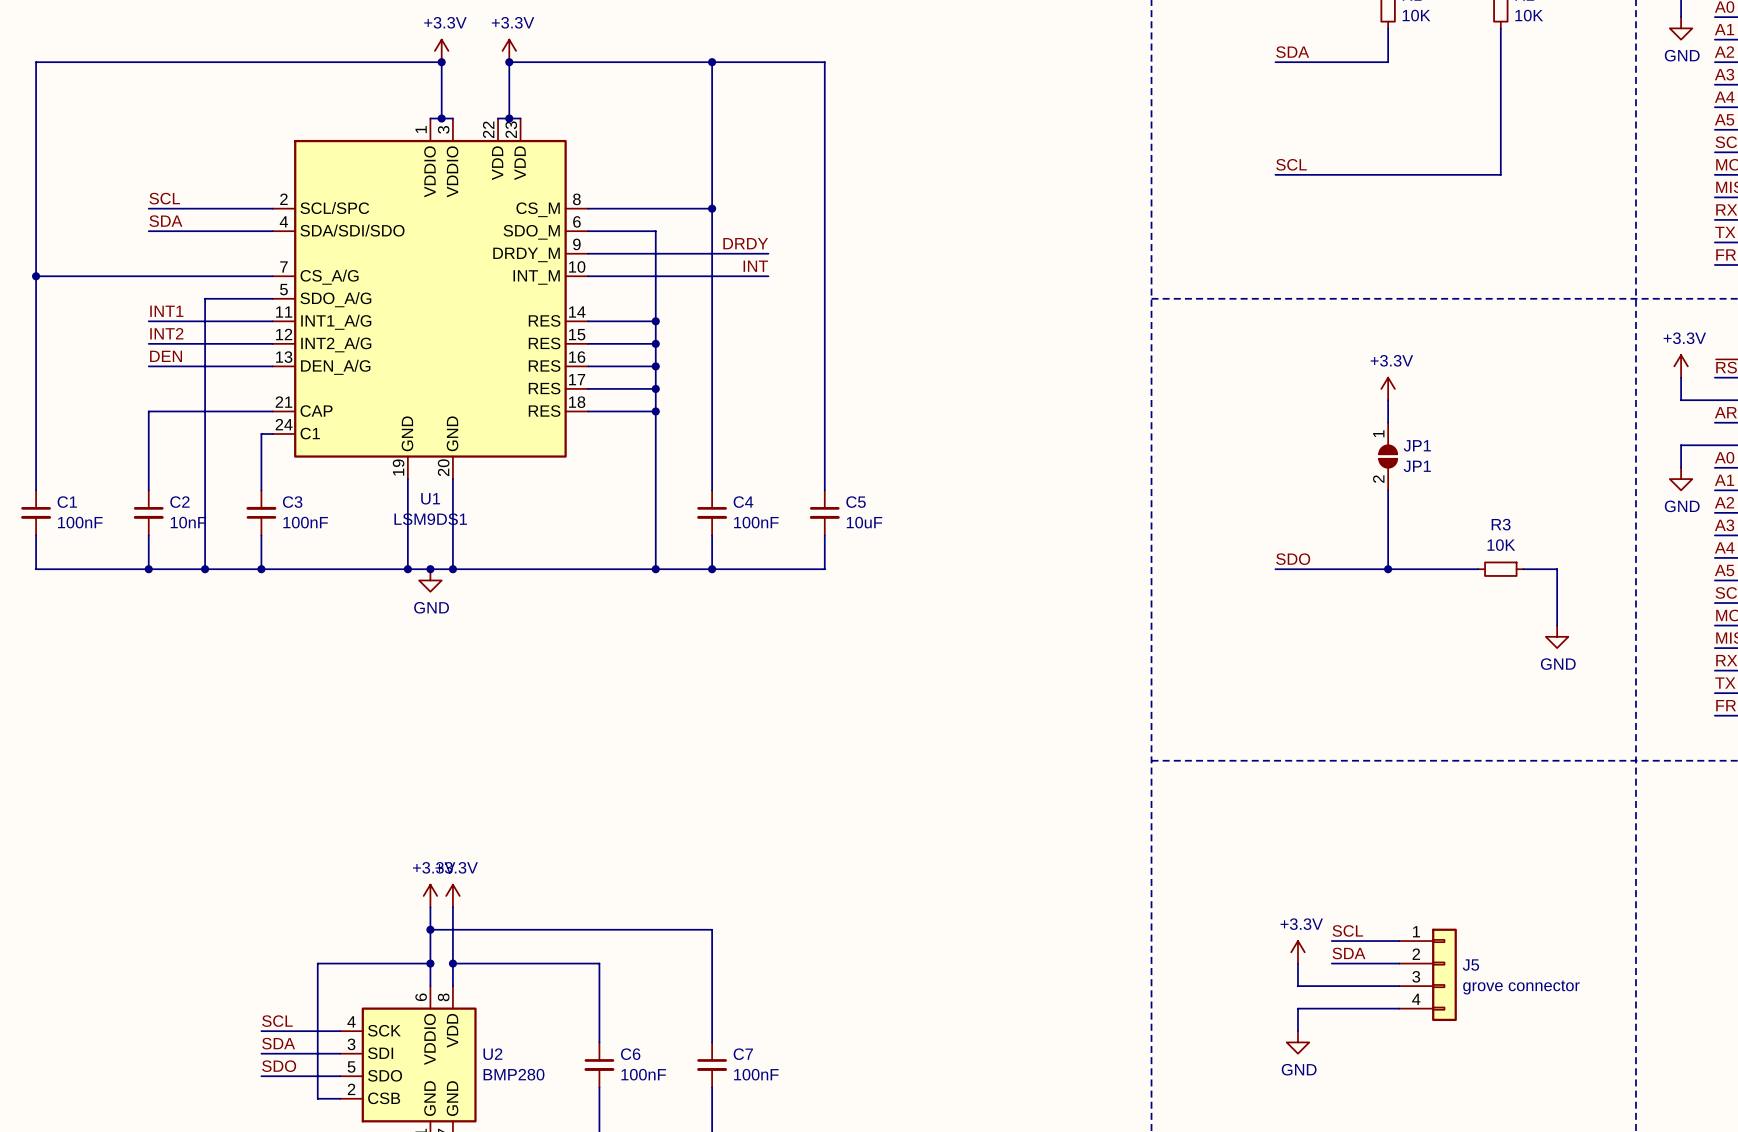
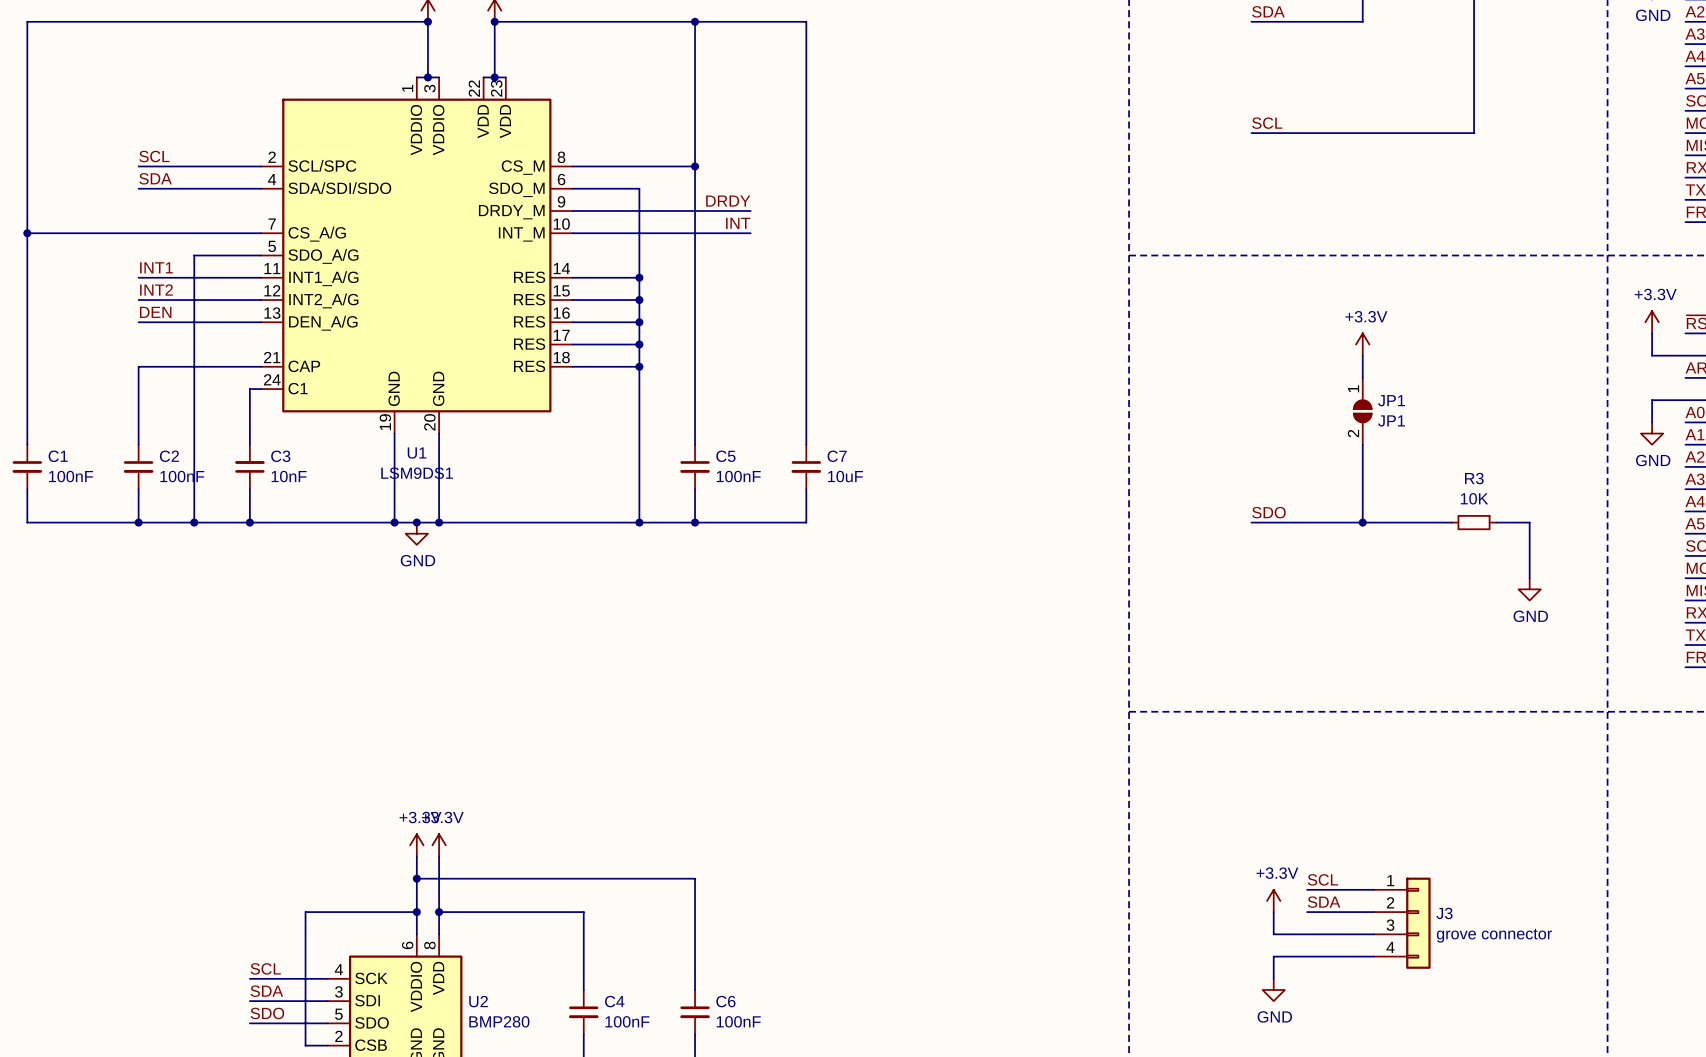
C4 name: C4 (743, 502) -> C5 (725, 456)
C5 name: C5 (856, 502) -> C7 (837, 456)
C2 value: 10nF (188, 522) -> 100nF (182, 476)
C3 value: 100nF (305, 522) -> 10nF (289, 476)
J5 name: J5 (1470, 965) -> J3 (1444, 913)
C6 name: C6 (630, 1054) -> C4 (614, 1001)
C7 name: C7 (743, 1054) -> C6 (725, 1001)

